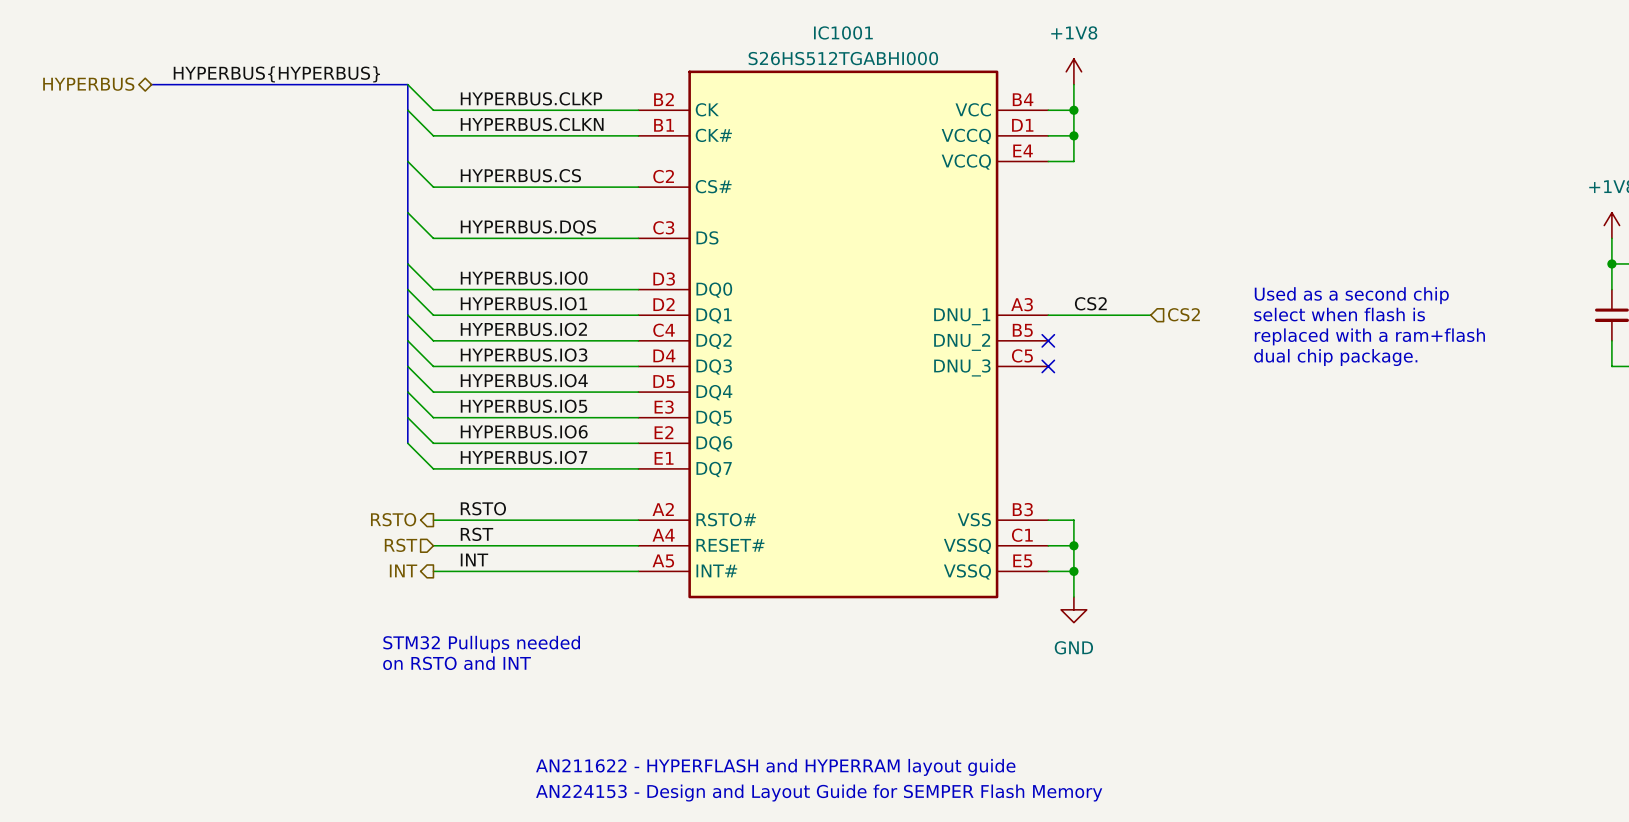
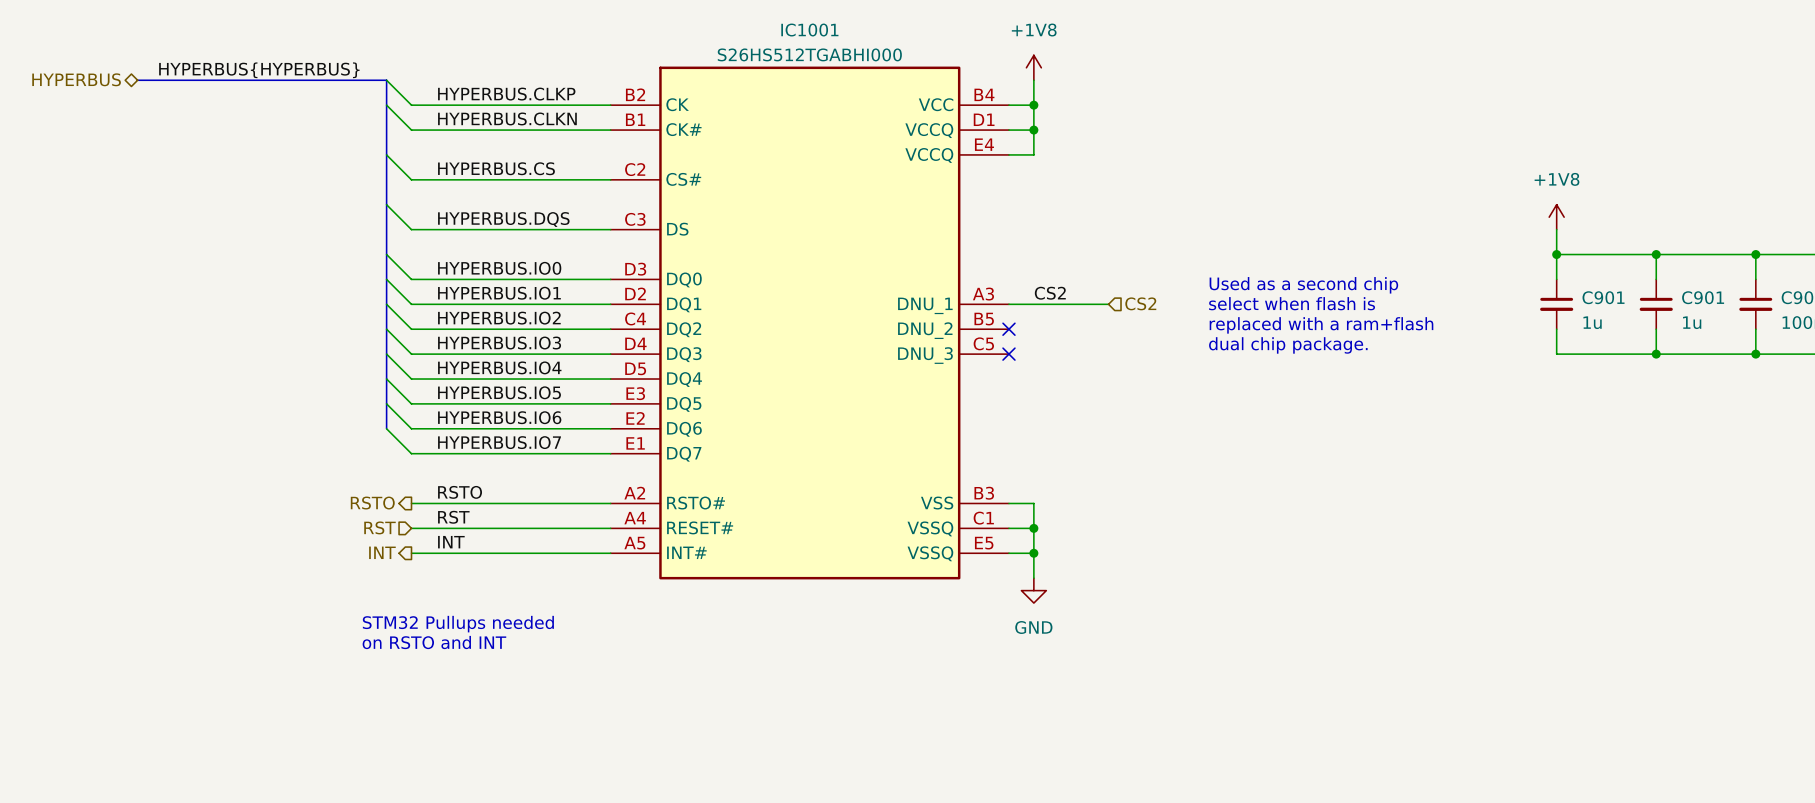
text: AN211622 - HYPERFLASH and HYPERRAM layout guide (775, 767) -> none
text: AN224153 - Design and Layout Guide for SEMPER Flash Memory (819, 793) -> none

